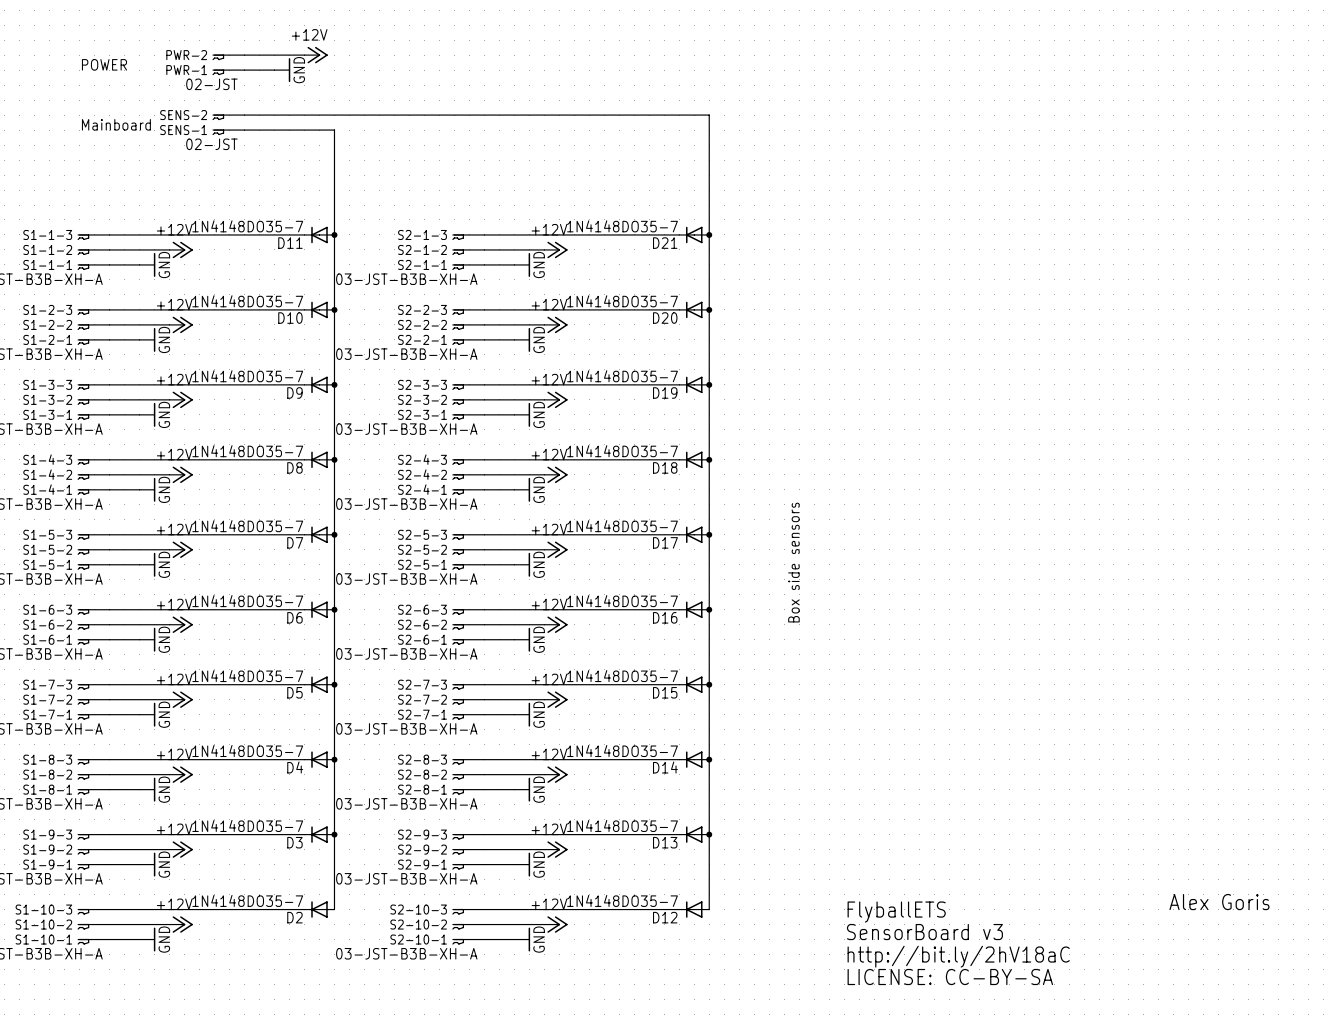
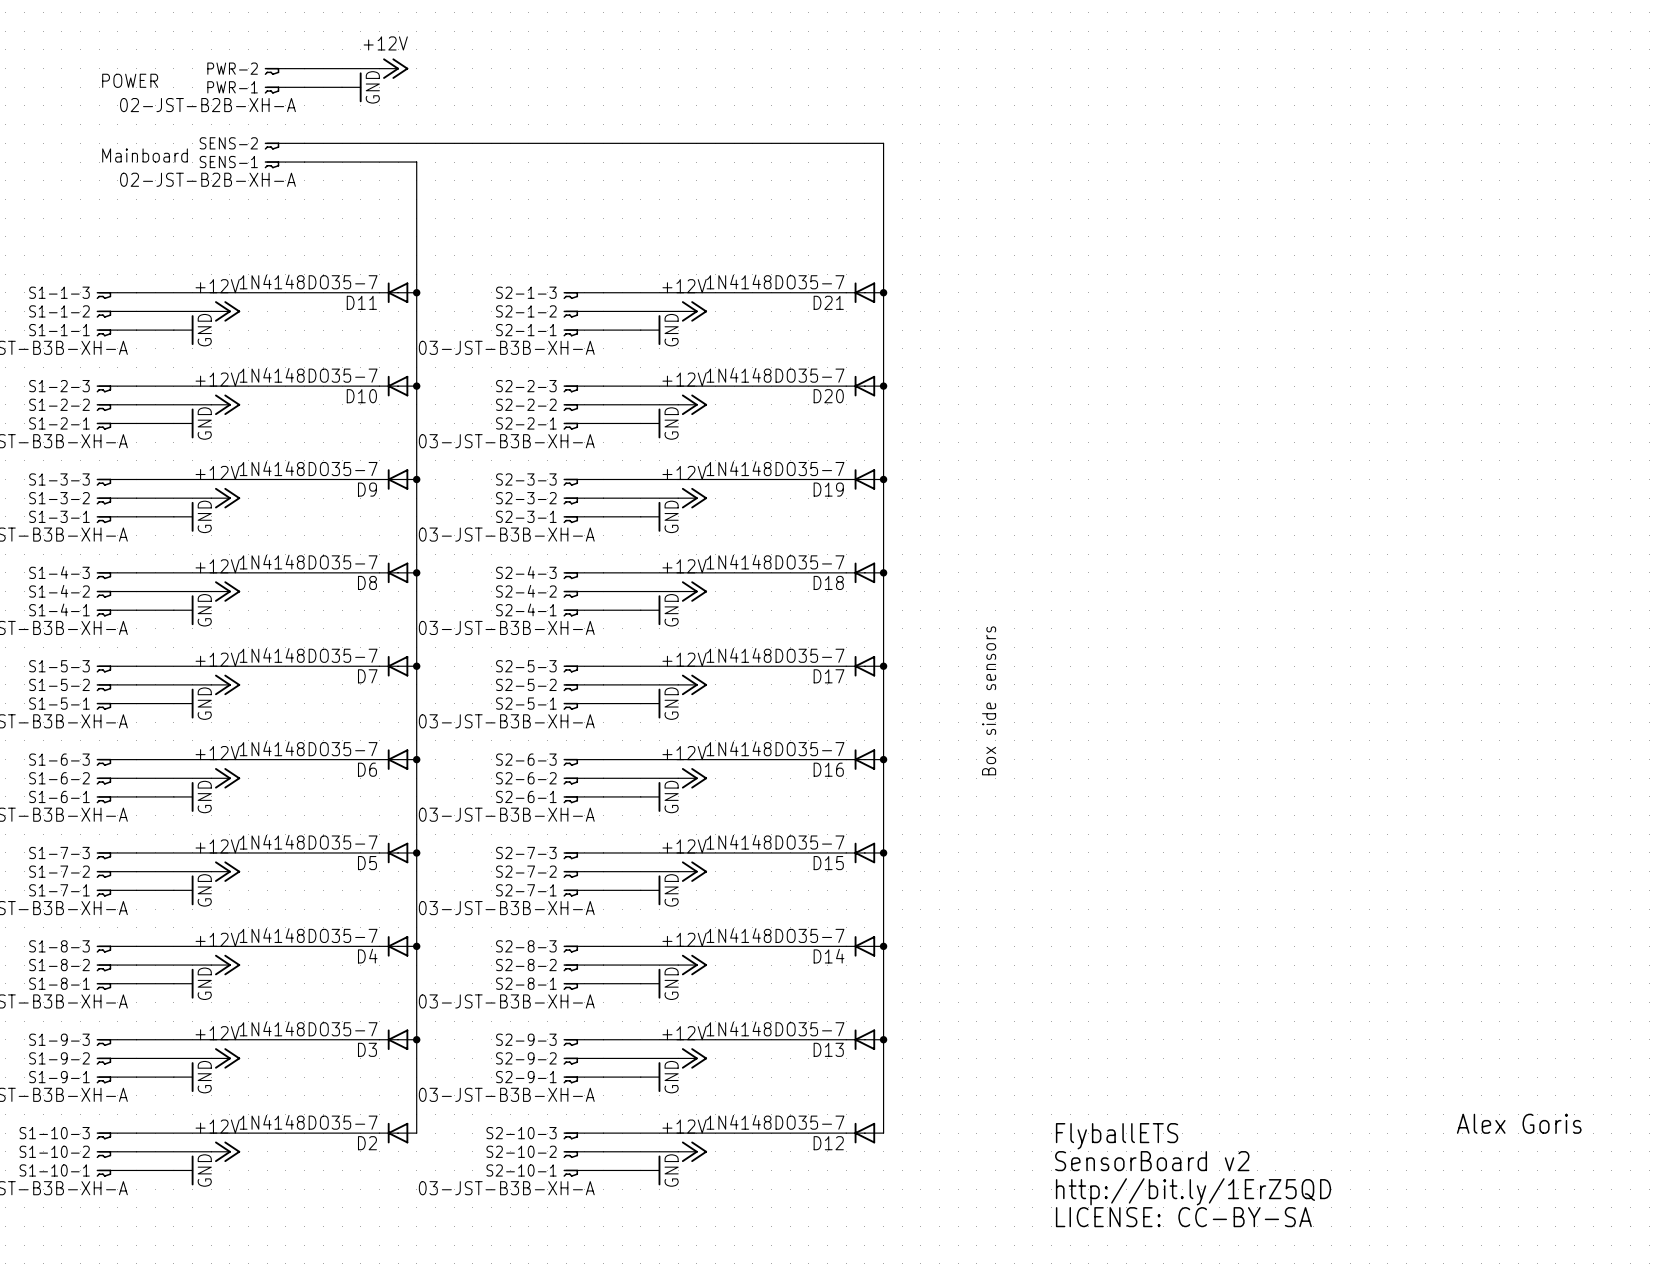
PWR-1 value: 02-JST (211, 84) -> 02-JST-B2B-XH-A (207, 105)
SENS-1 value: 02-JST (211, 144) -> 02-JST-B2B-XH-A (207, 179)
text: SensorBoard v3 (924, 932) -> SensorBoard v2 (1152, 1161)
text: http://bit.ly/2hV18aC (958, 956) -> http://bit.ly/1ErZ5QD (1193, 1191)

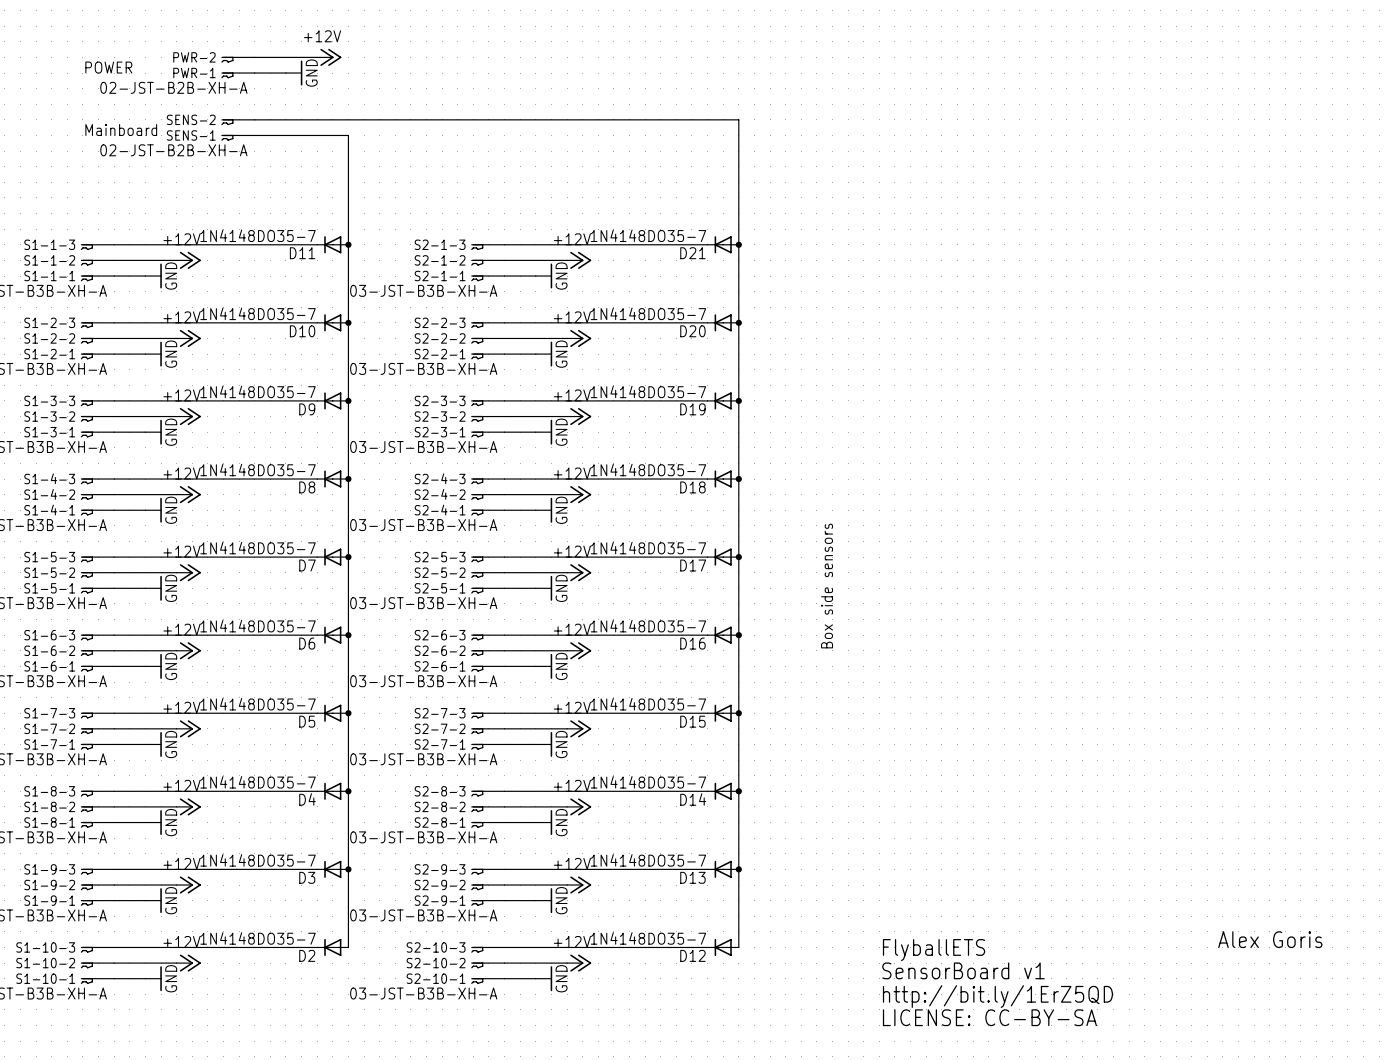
text: SensorBoard v2 (1152, 1161) -> SensorBoard v1 (963, 970)

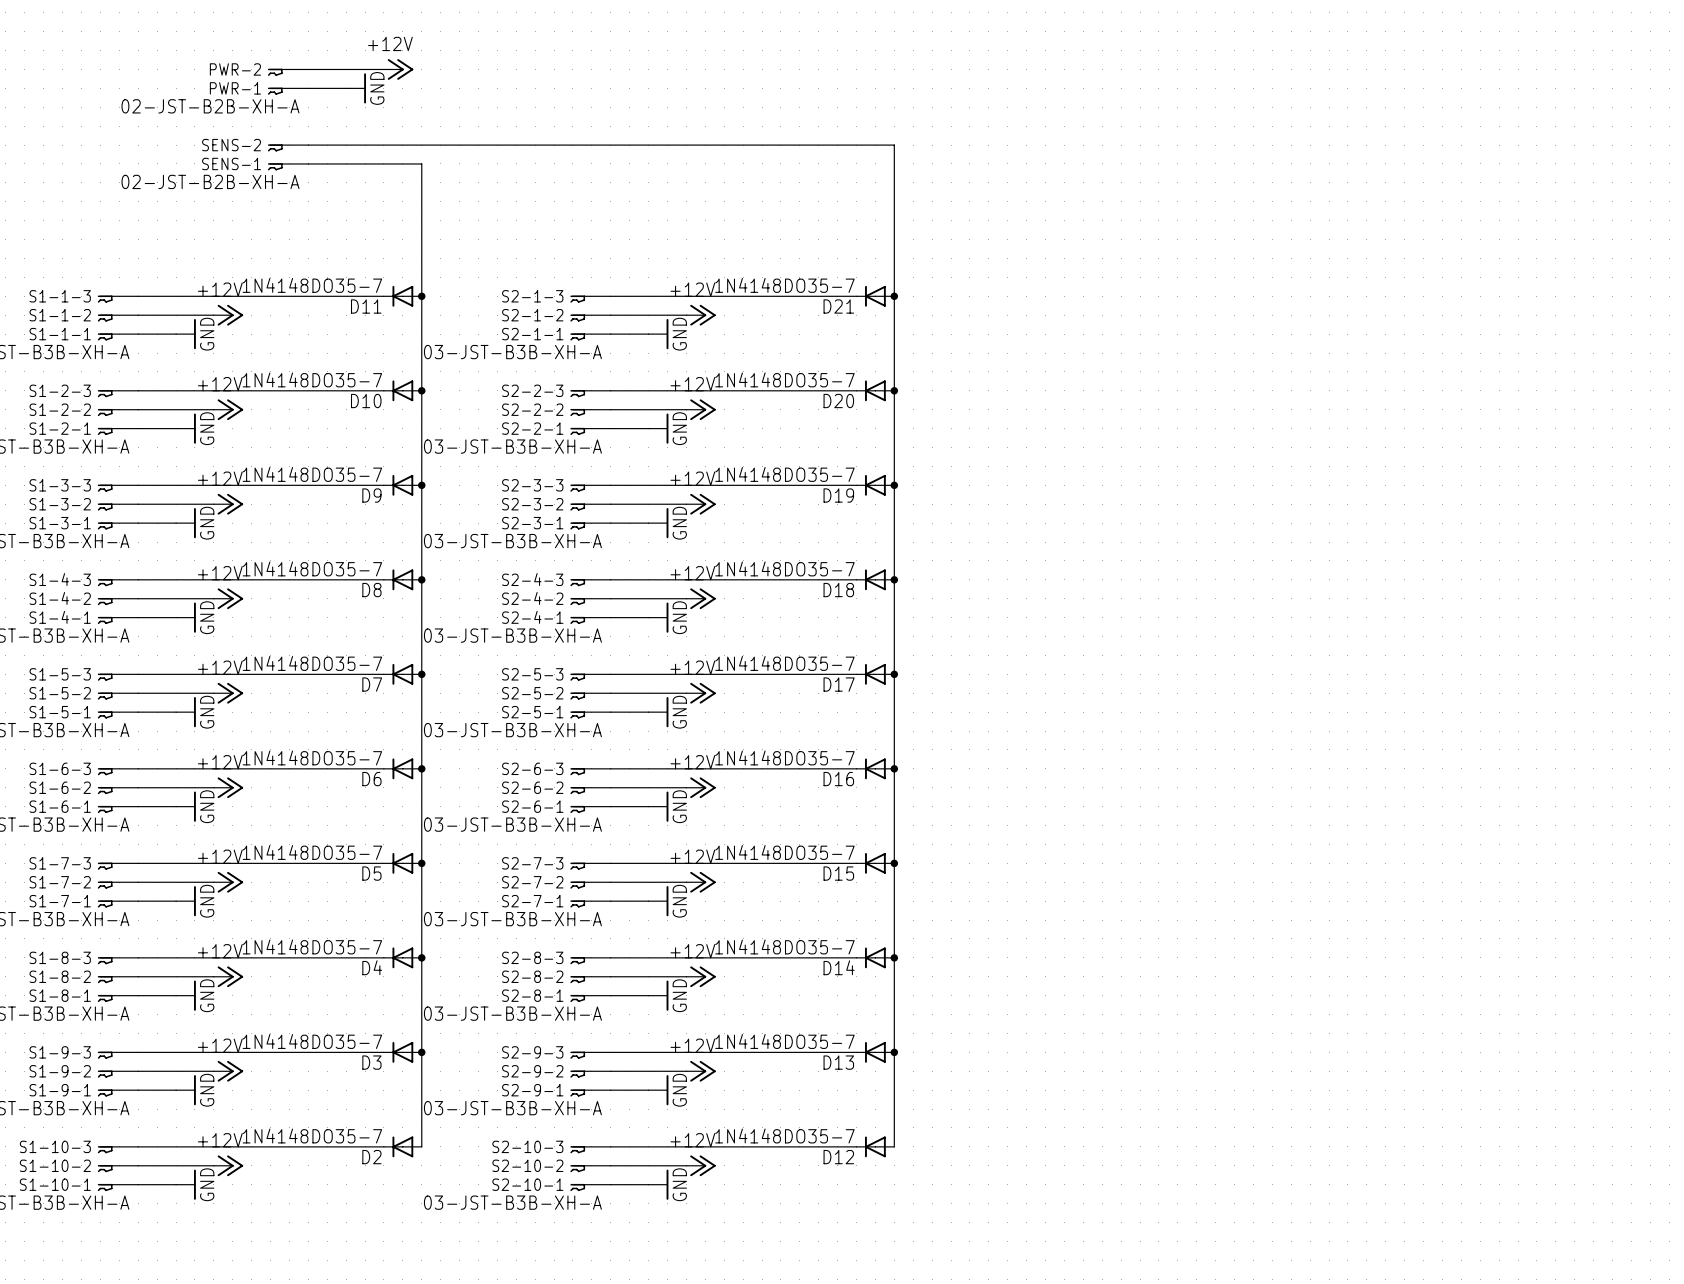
text: POWER (108, 67) -> none
text: Mainboard (121, 130) -> none
text: Box side sensors (827, 586) -> none
text: Alex Goris (1270, 939) -> none
text: FlyballETS (934, 950) -> none
text: SensorBoard v1 (963, 970) -> none
text: http://bit.ly/1ErZ5QD (997, 996) -> none
text: LICENSE: CC-BY-SA (989, 1017) -> none

